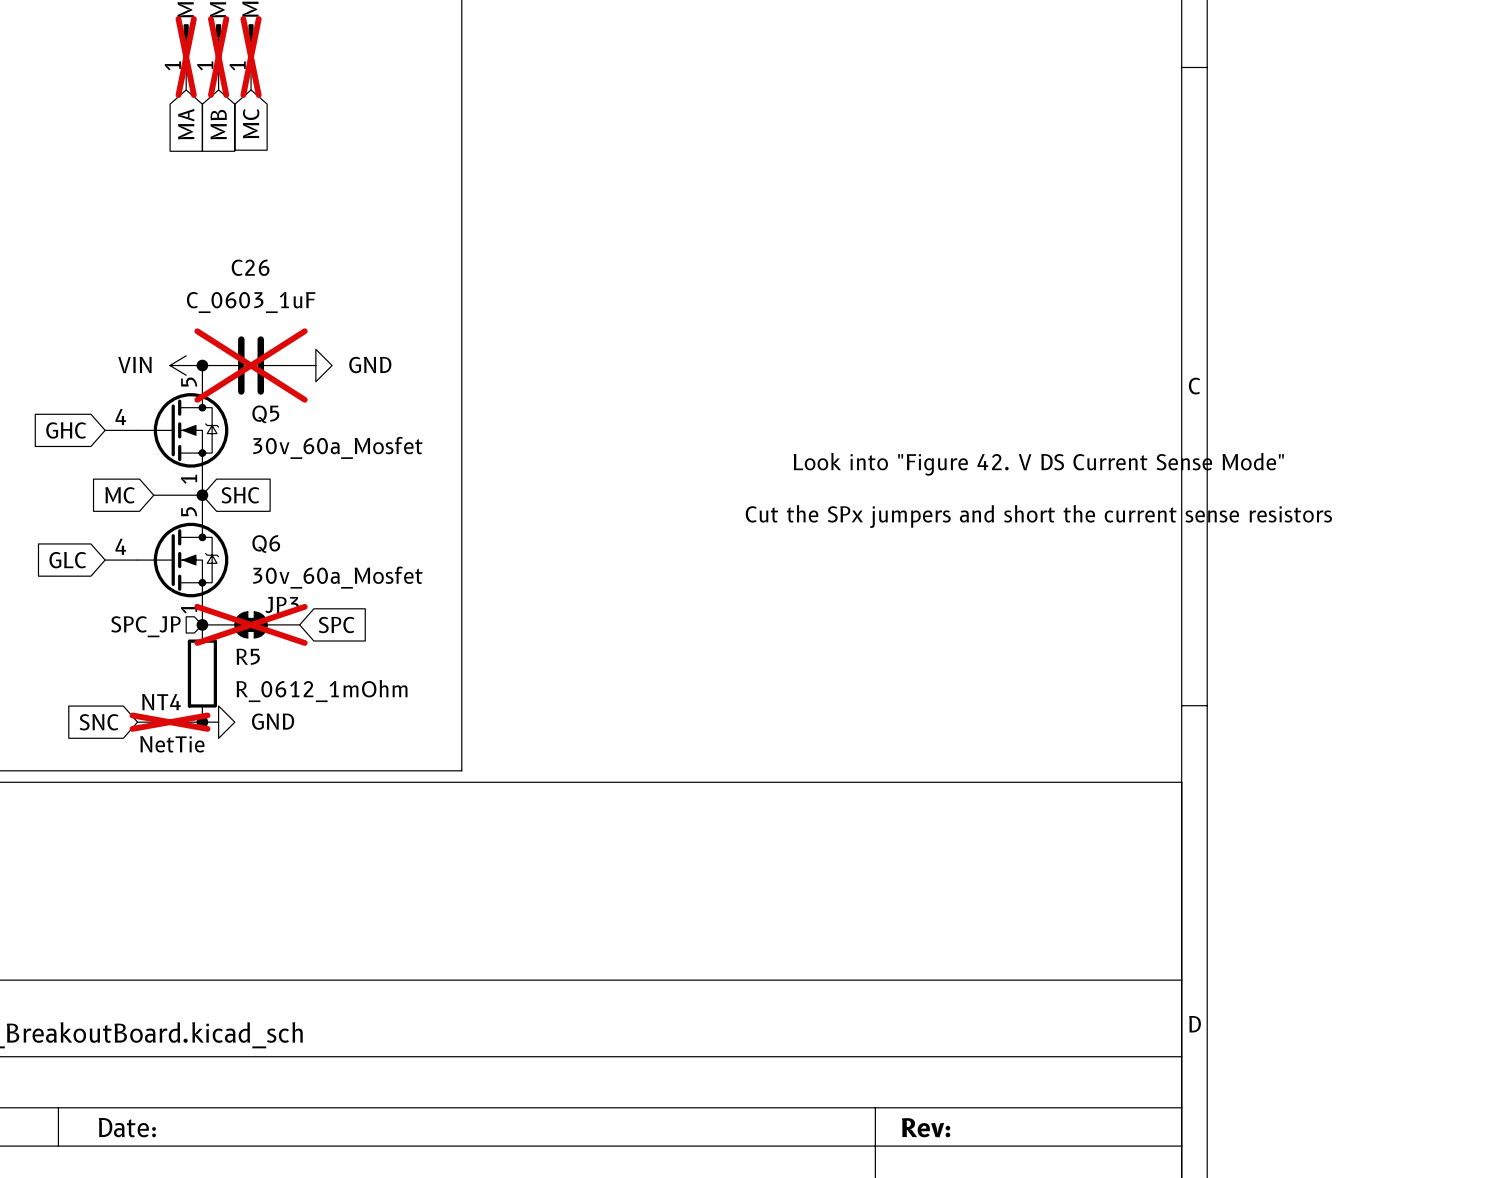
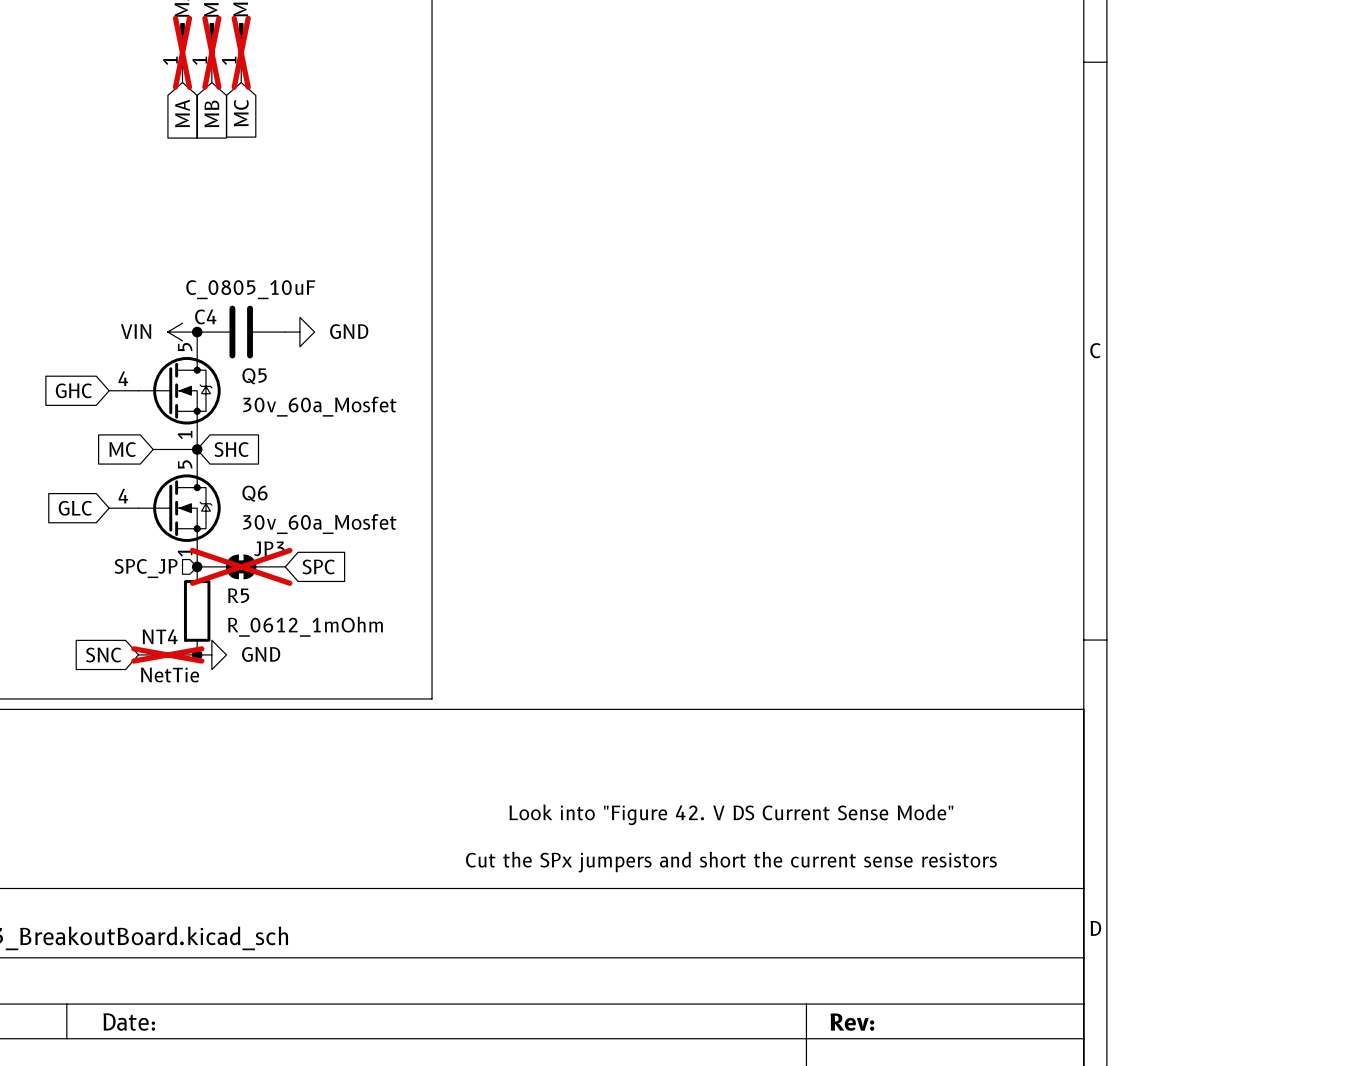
C26 name: C26 (250, 267) -> C4 (205, 316)
C26 value: C_0603_1uF (251, 302) -> C_0805_10uF (250, 289)
C26 do-not-place cross: (251, 365) -> none
text: Look into "Figure 42. V DS Current Sense Mode" (1038, 464) -> none
text: Cut the SPx jumpers and short the current sense resistors (1038, 516) -> none
text: none -> Look into "Figure 42. V DS Current Sense Mode" (731, 814)
text: none -> Cut the SPx jumpers and short the current sense resistors (731, 862)

